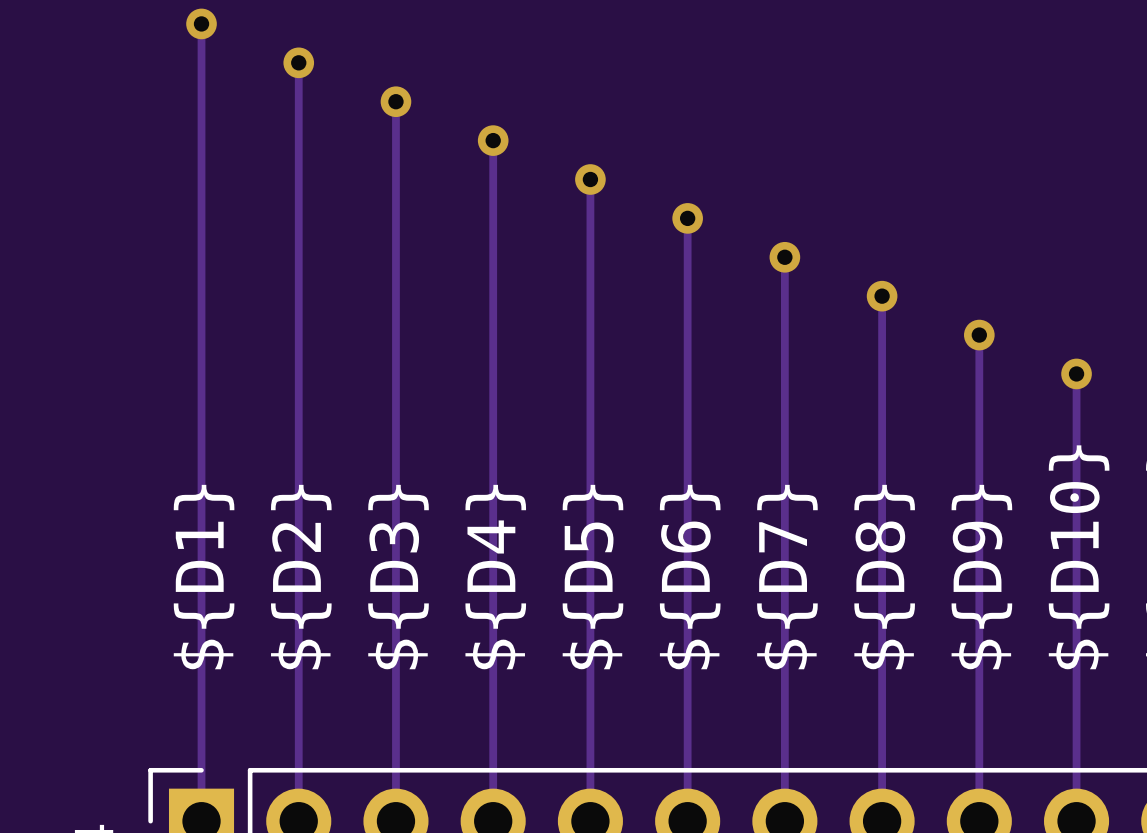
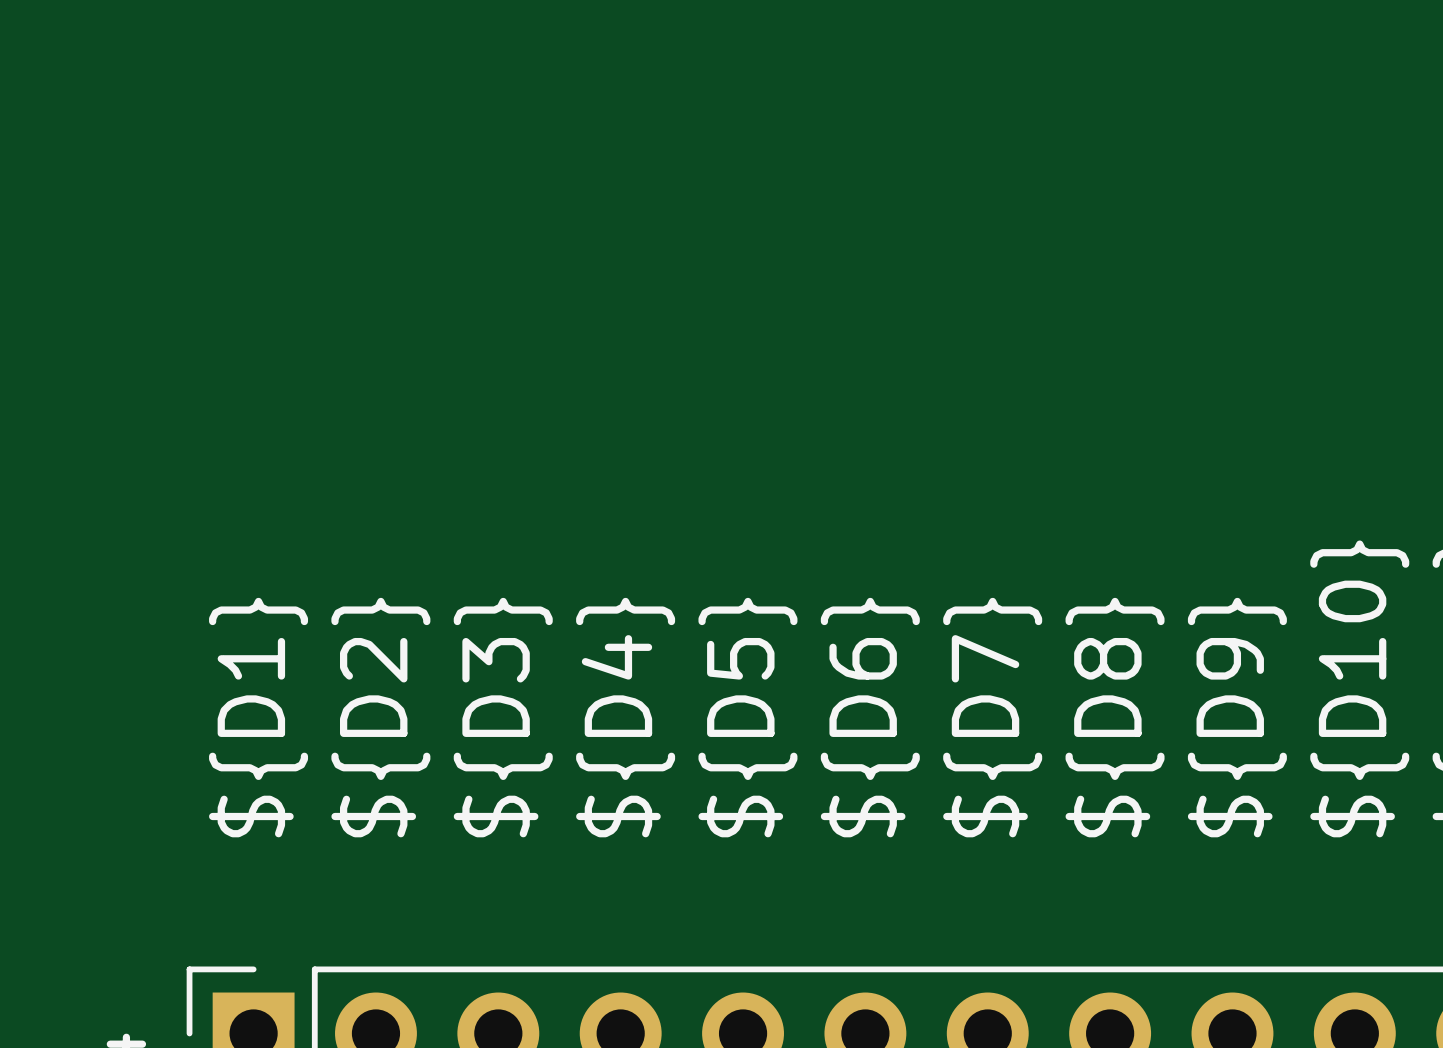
track: (201, 23) (201, 821) -> none
via: (201, 23) -> none
track: (298, 62) (298, 821) -> none
via: (298, 62) -> none
track: (395, 101) (395, 821) -> none
via: (395, 101) -> none
track: (493, 140) (493, 821) -> none
via: (493, 140) -> none
track: (590, 179) (590, 821) -> none
via: (590, 179) -> none
track: (687, 218) (687, 821) -> none
via: (687, 218) -> none
track: (784, 257) (784, 821) -> none
via: (784, 257) -> none
track: (882, 296) (882, 821) -> none
via: (882, 296) -> none
track: (979, 335) (979, 821) -> none
via: (979, 335) -> none
track: (1076, 373) (1076, 821) -> none
via: (1076, 373) -> none

